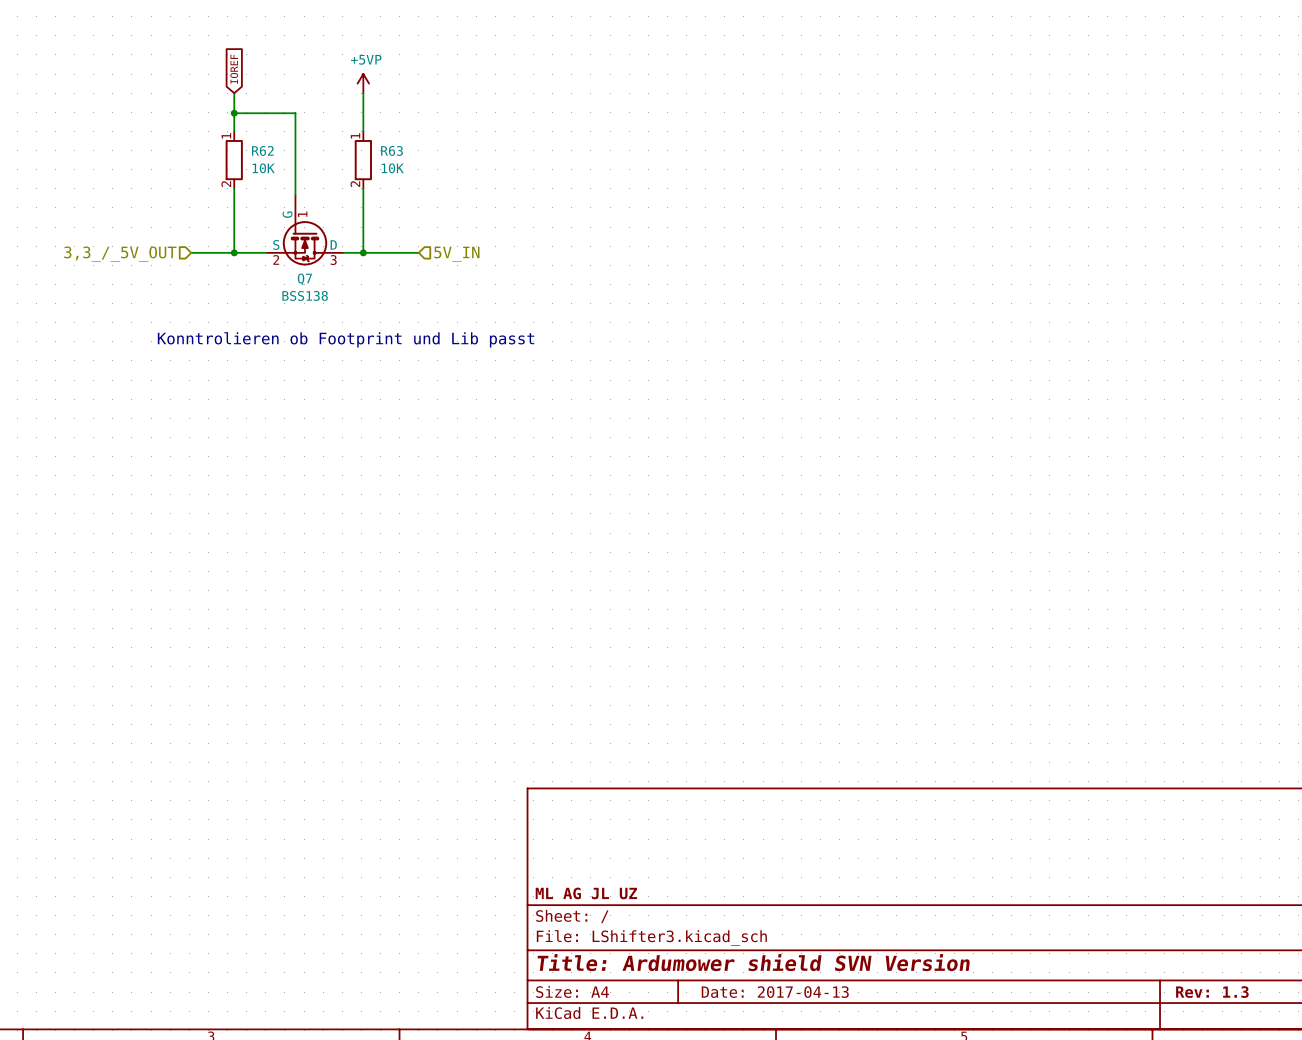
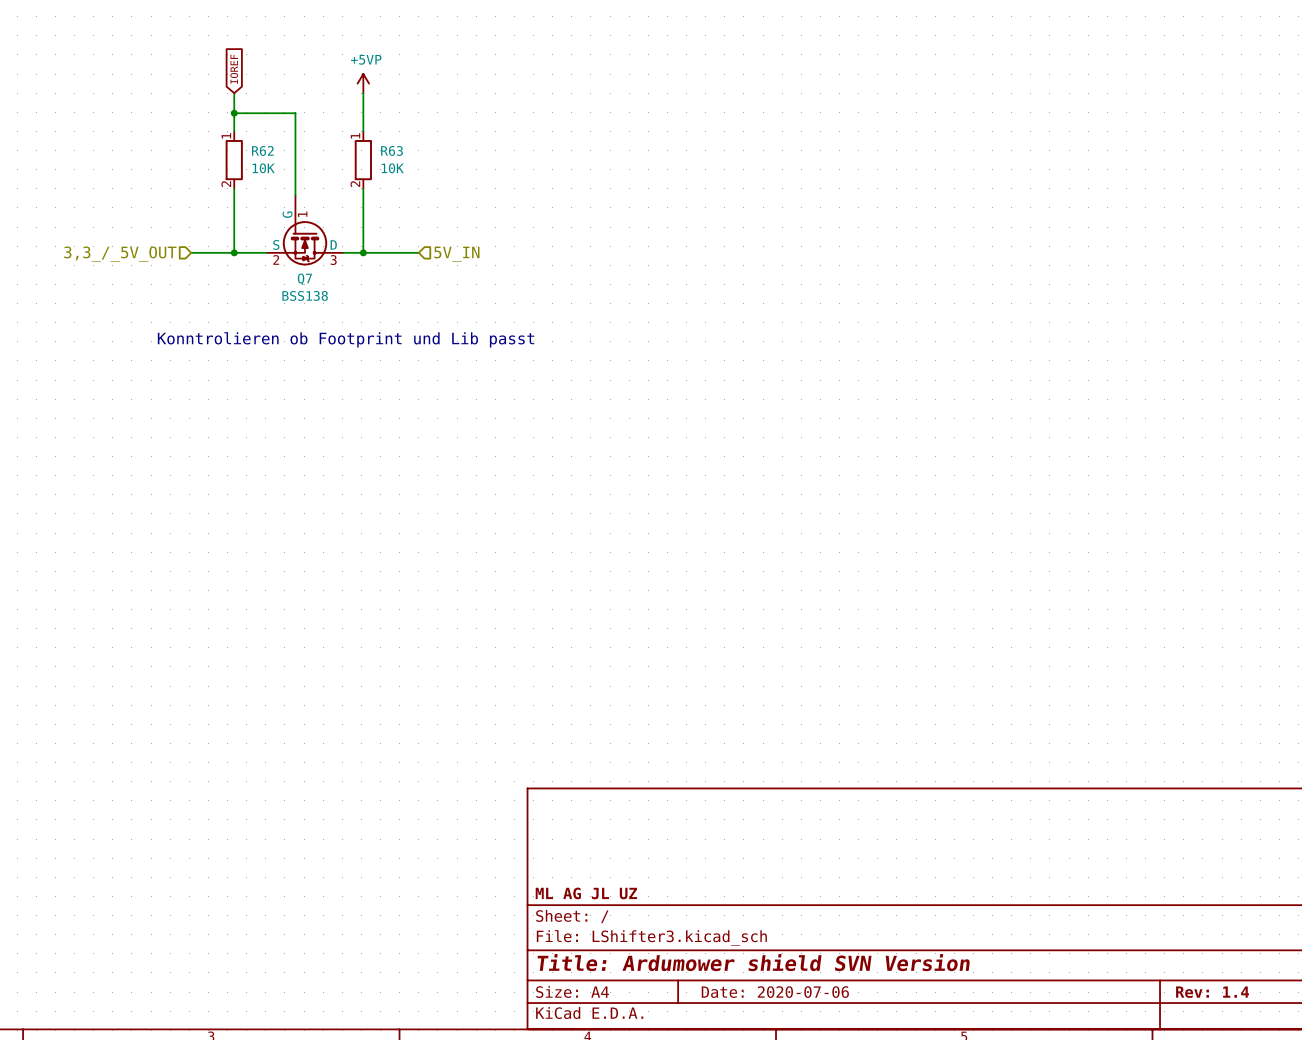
title block: Date: 2017-04-13 (775, 992) -> Date: 2020-07-06 (775, 992)
title block: Rev: 1.3 (1212, 992) -> Rev: 1.4 (1212, 992)

